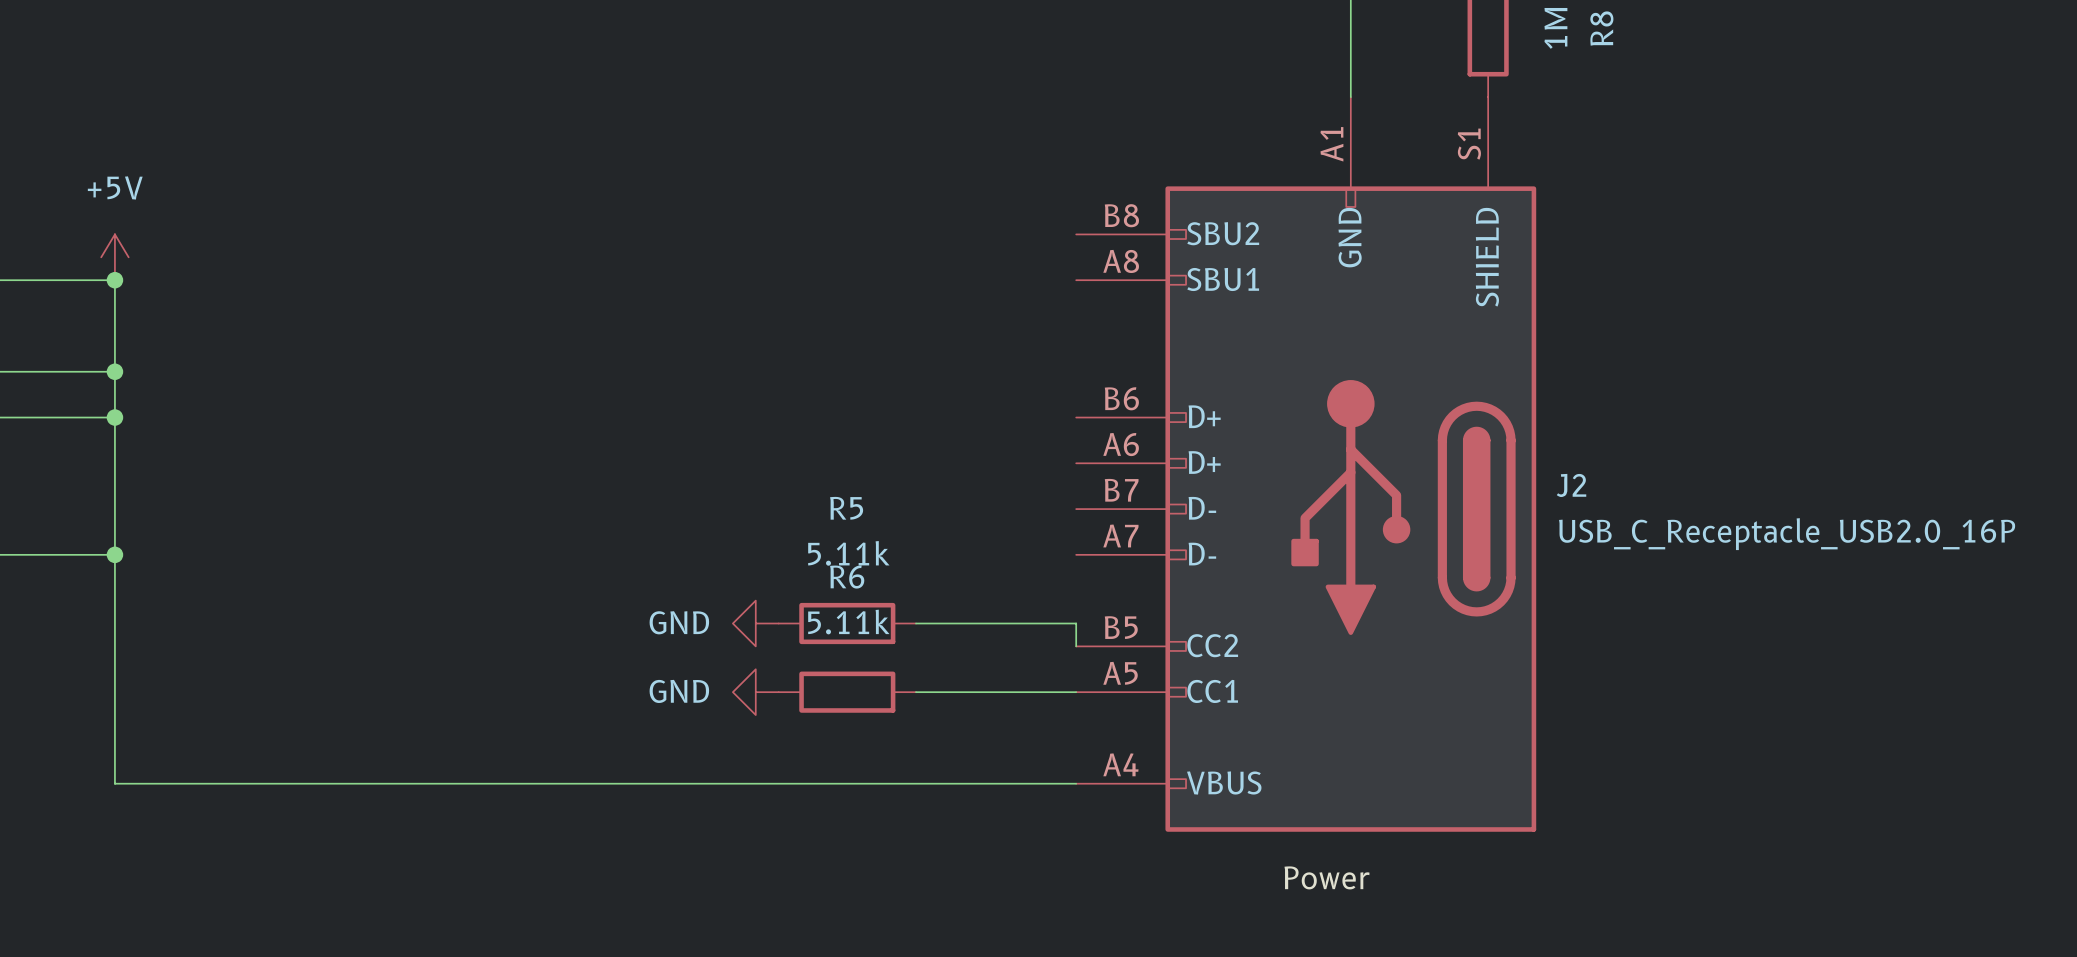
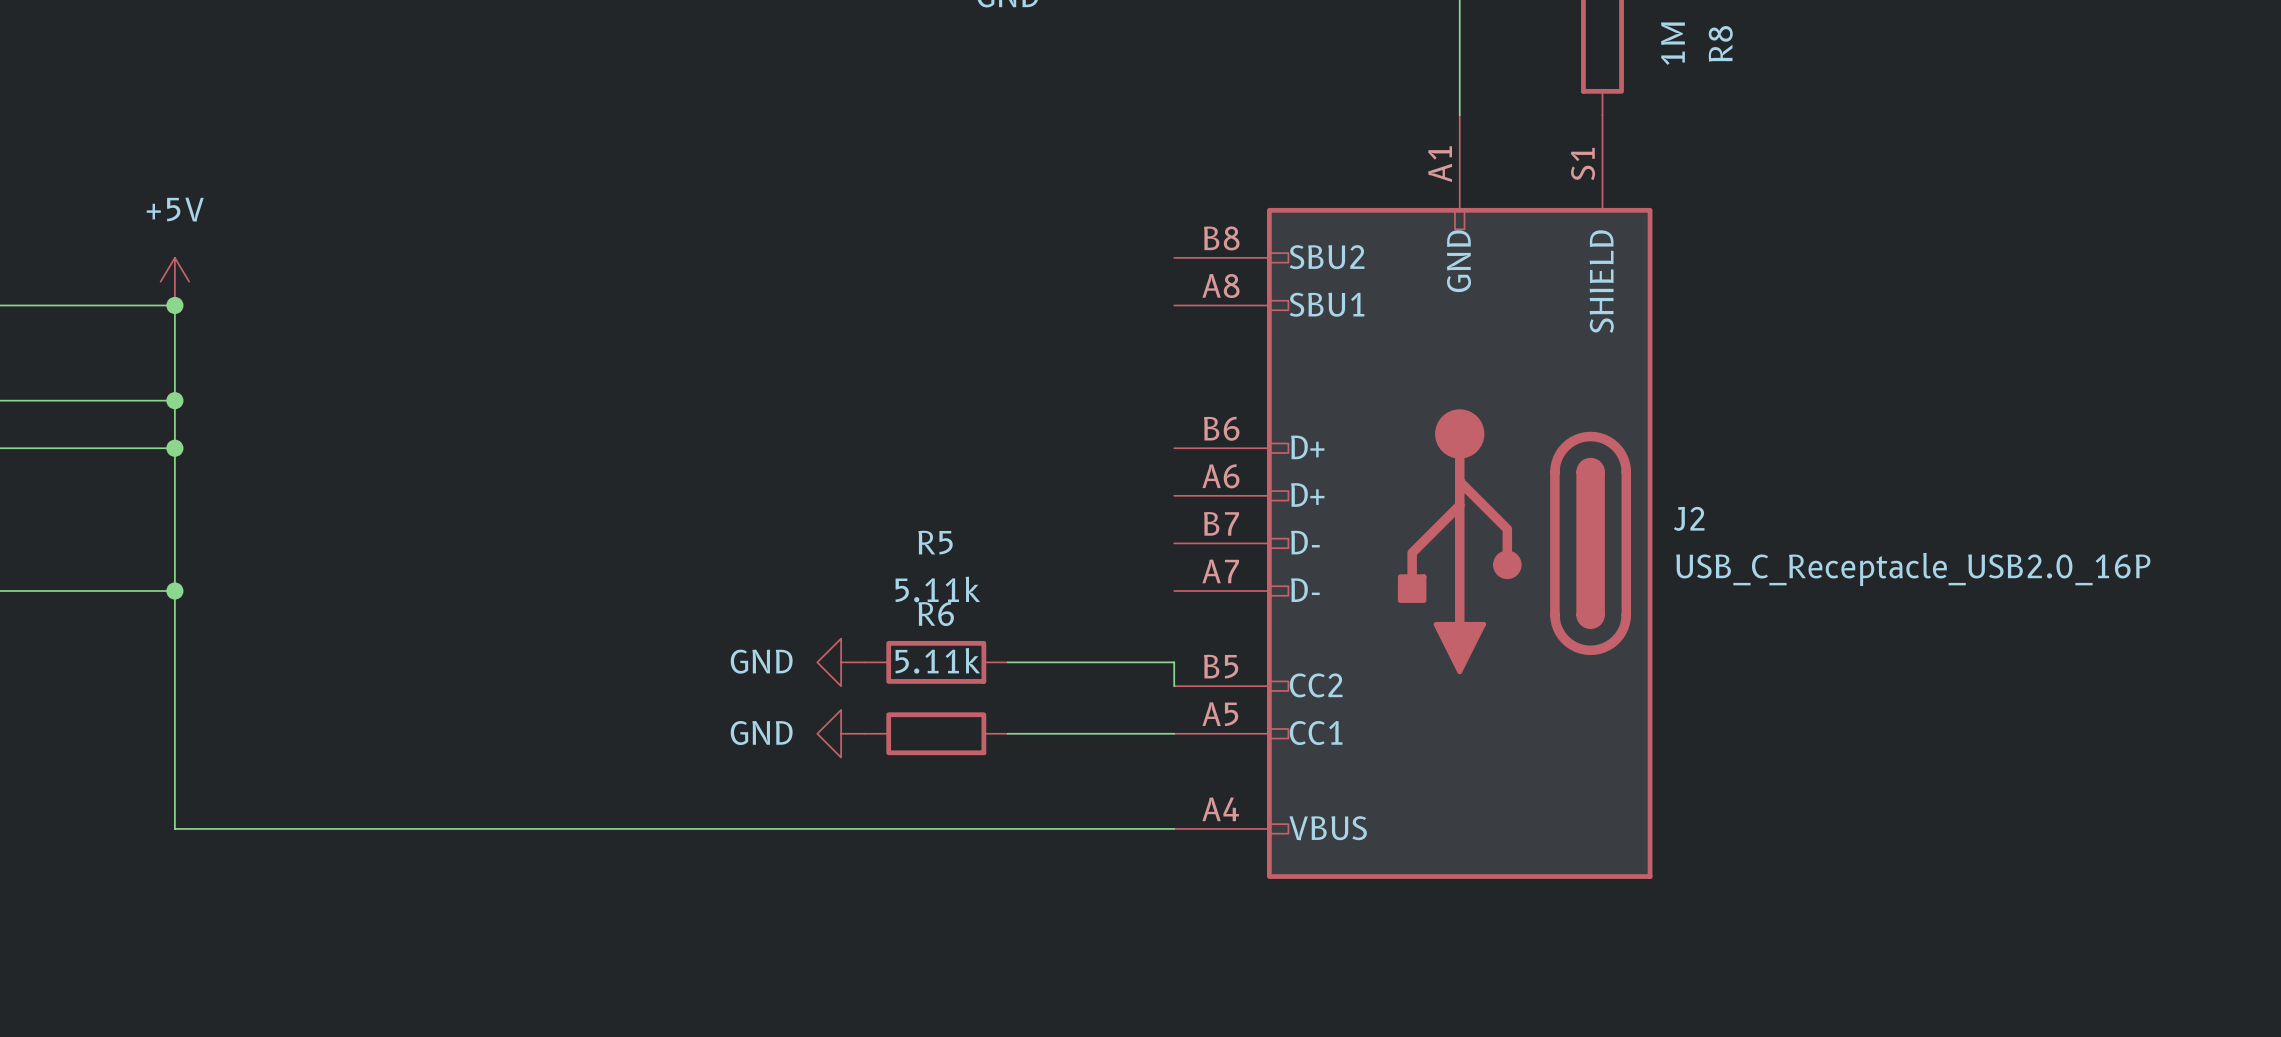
label: Power (1326, 877) -> none

